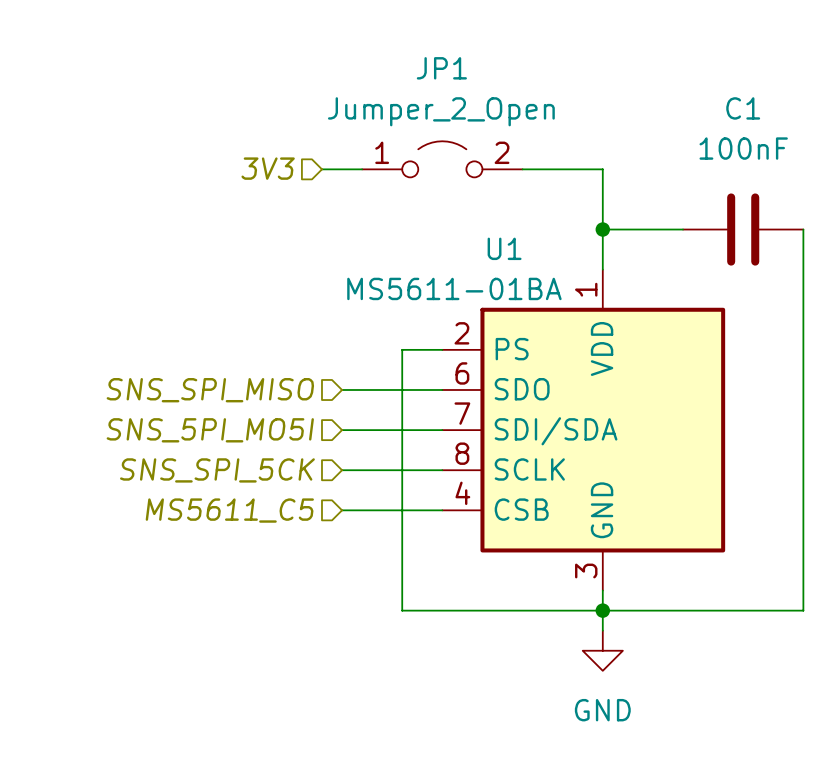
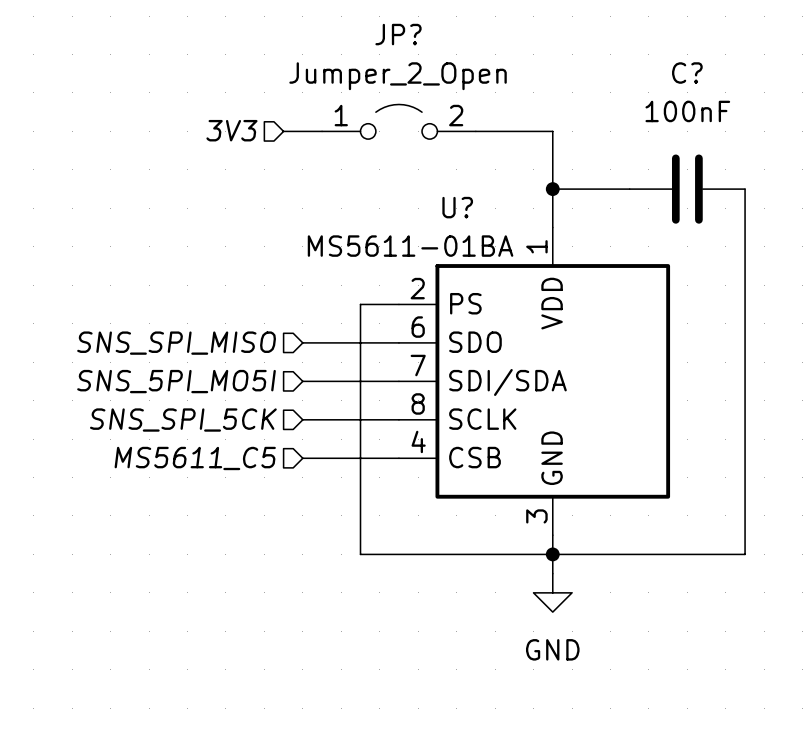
JP1 name: JP1 (441, 68) -> JP? (398, 34)
C1 name: C1 (743, 108) -> C? (687, 73)
U1 name: U1 (504, 248) -> U? (457, 207)

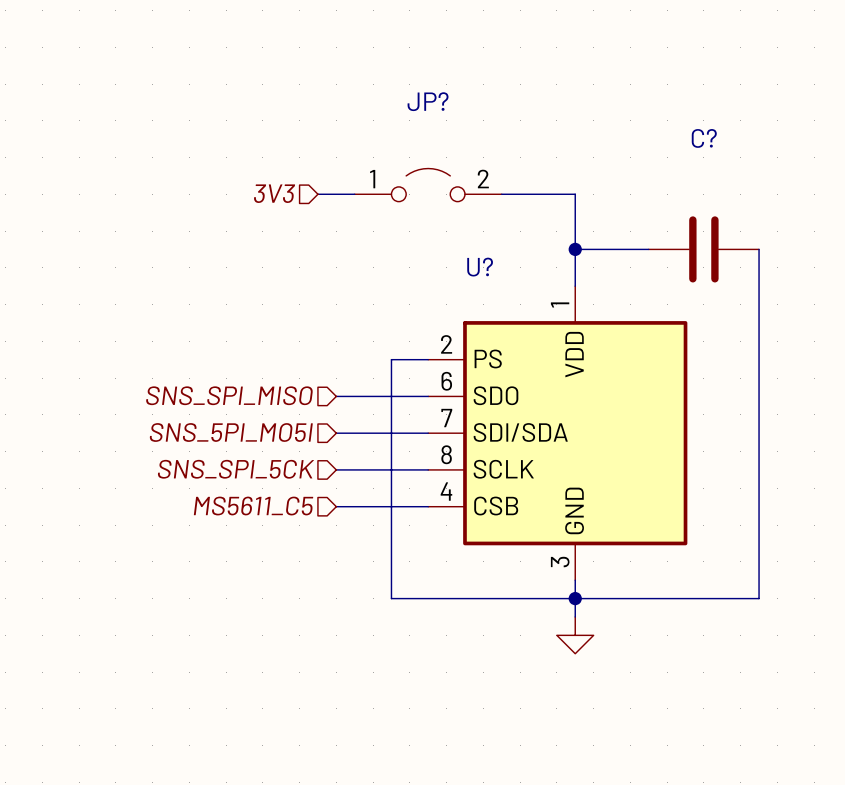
JP? value: Jumper_2_Open (398, 76) -> none
C? value: 100nF (687, 111) -> none
U? value: MS5611-01BA (410, 246) -> none
power symbol text: GND (552, 649) -> none

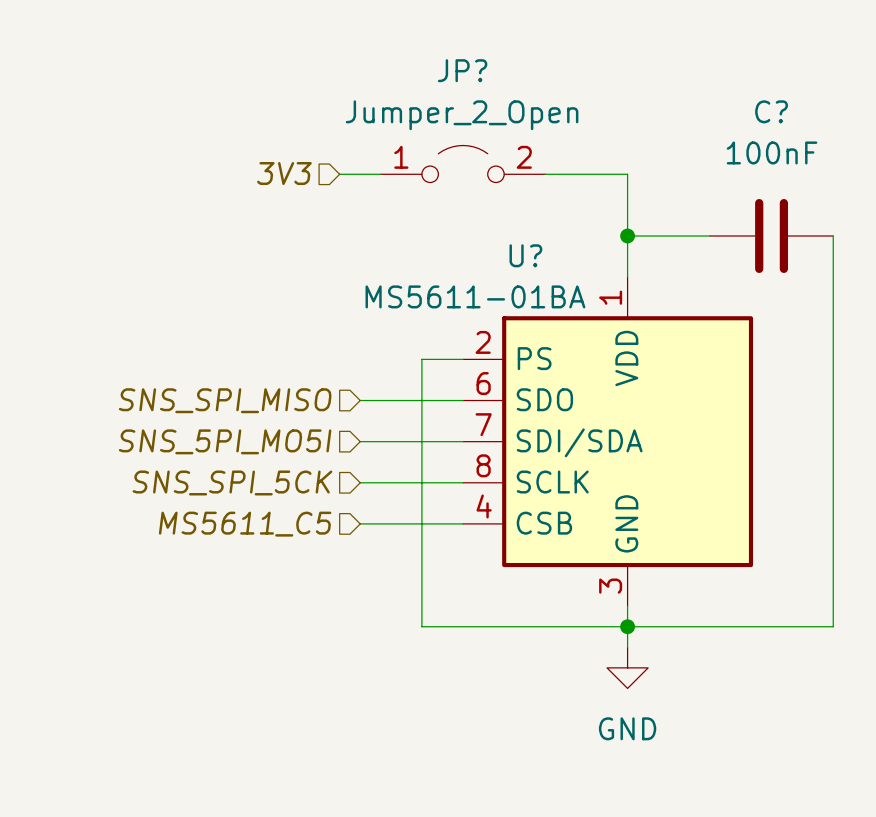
JP? value: none -> Jumper_2_Open (462, 115)
C? value: none -> 100nF (772, 152)
U? value: none -> MS5611-01BA (475, 296)
power symbol text: none -> GND (627, 728)

